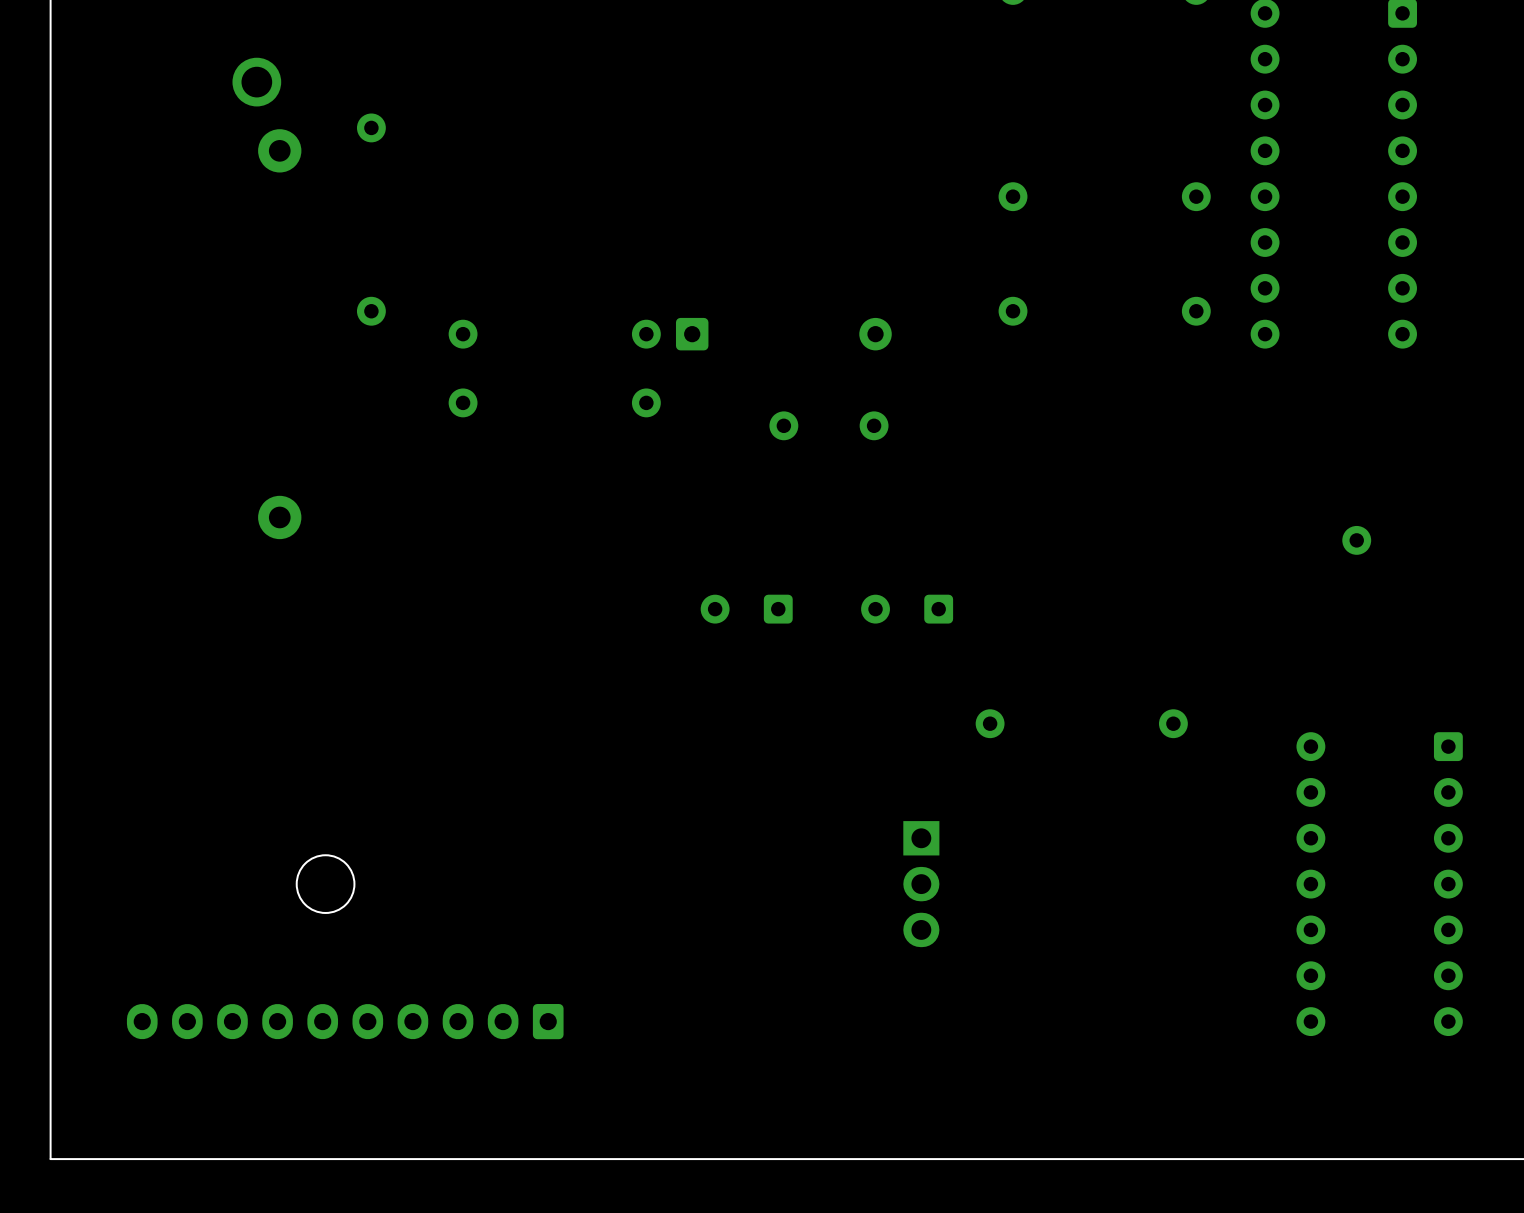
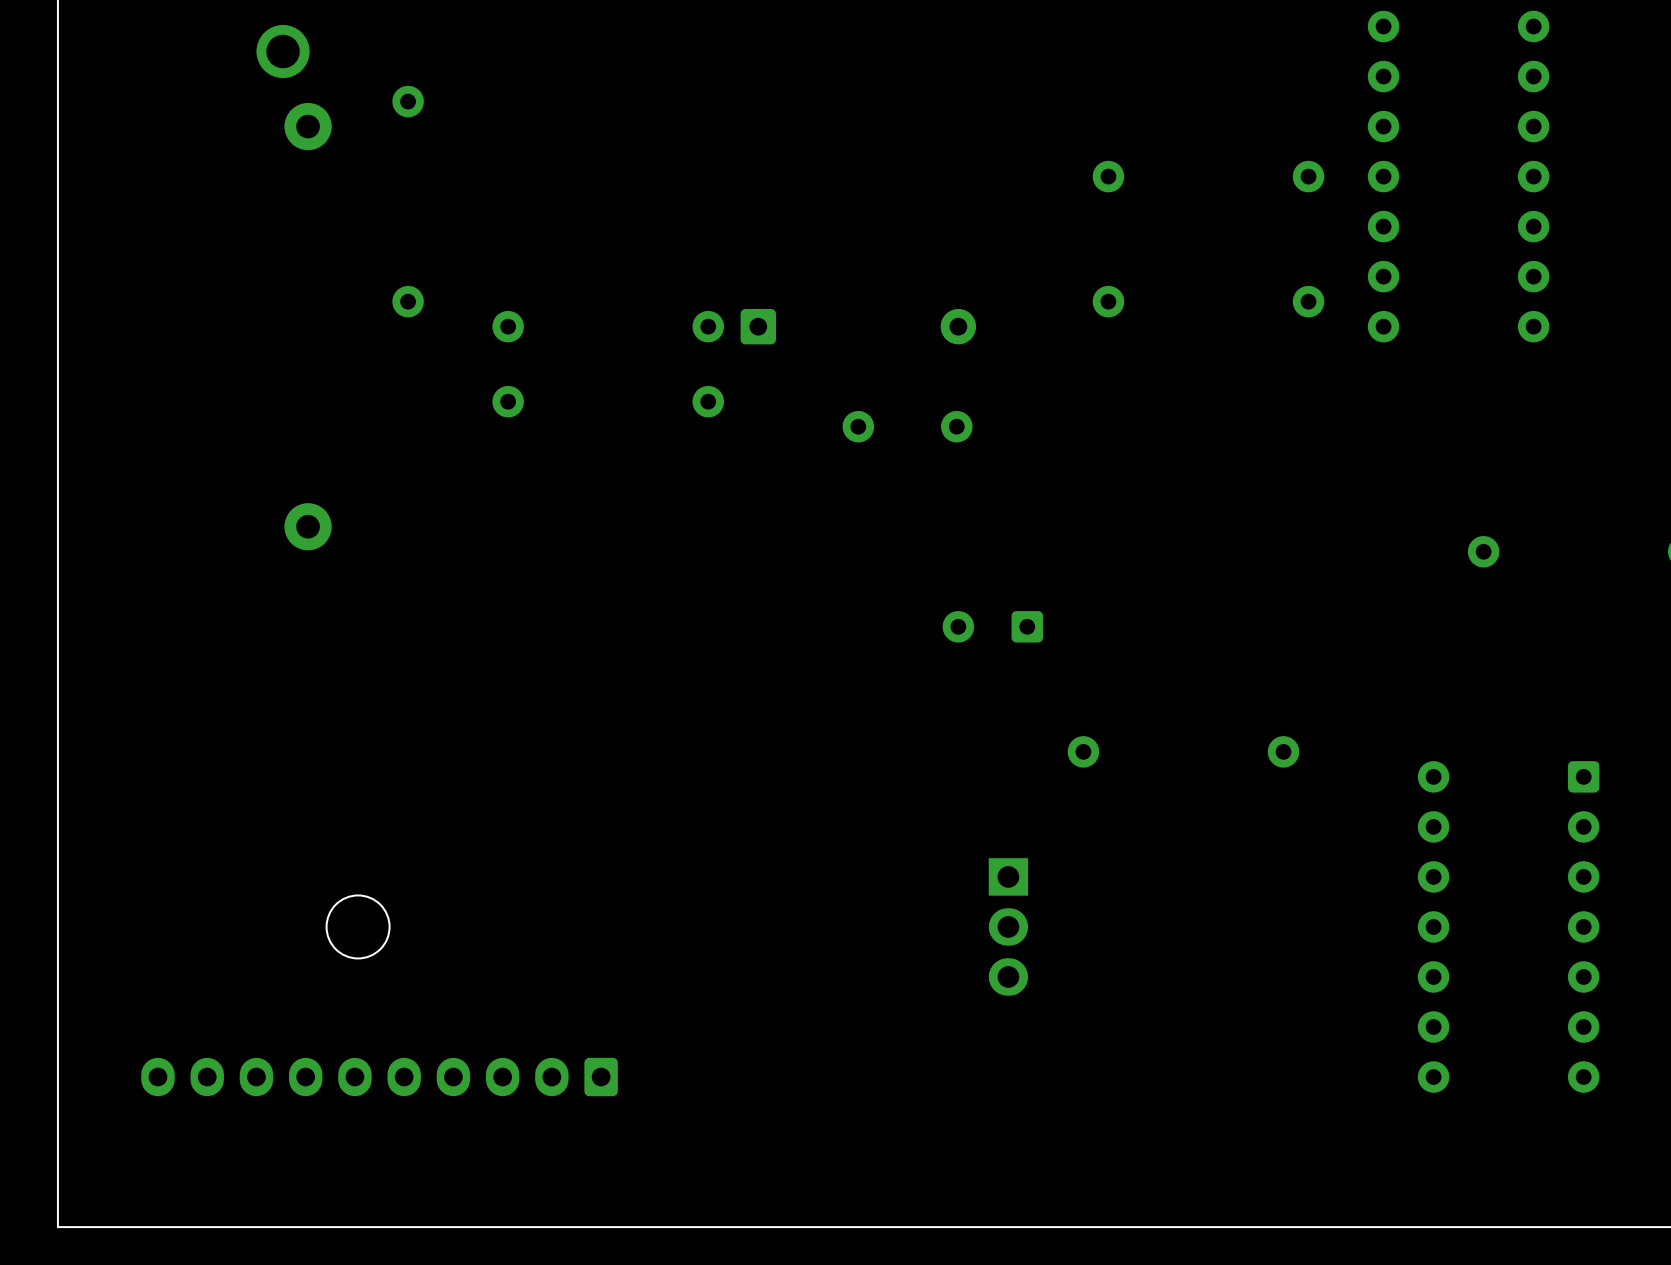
part: (746, 609) -> none

